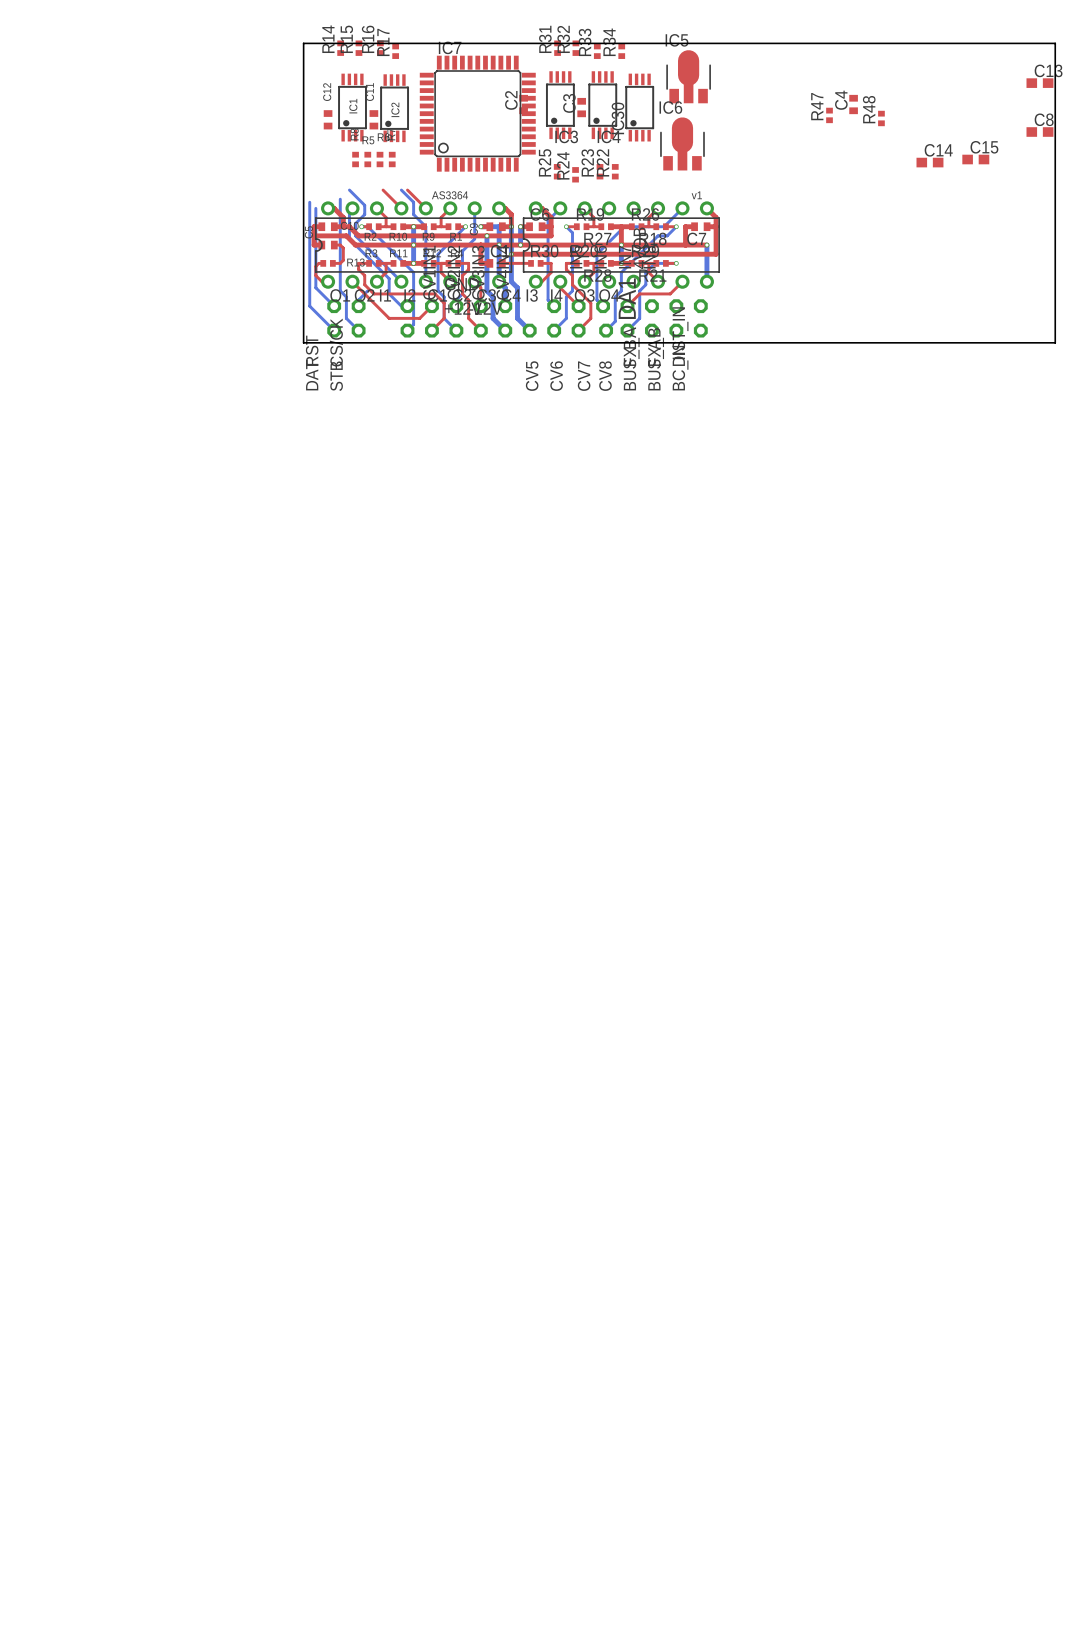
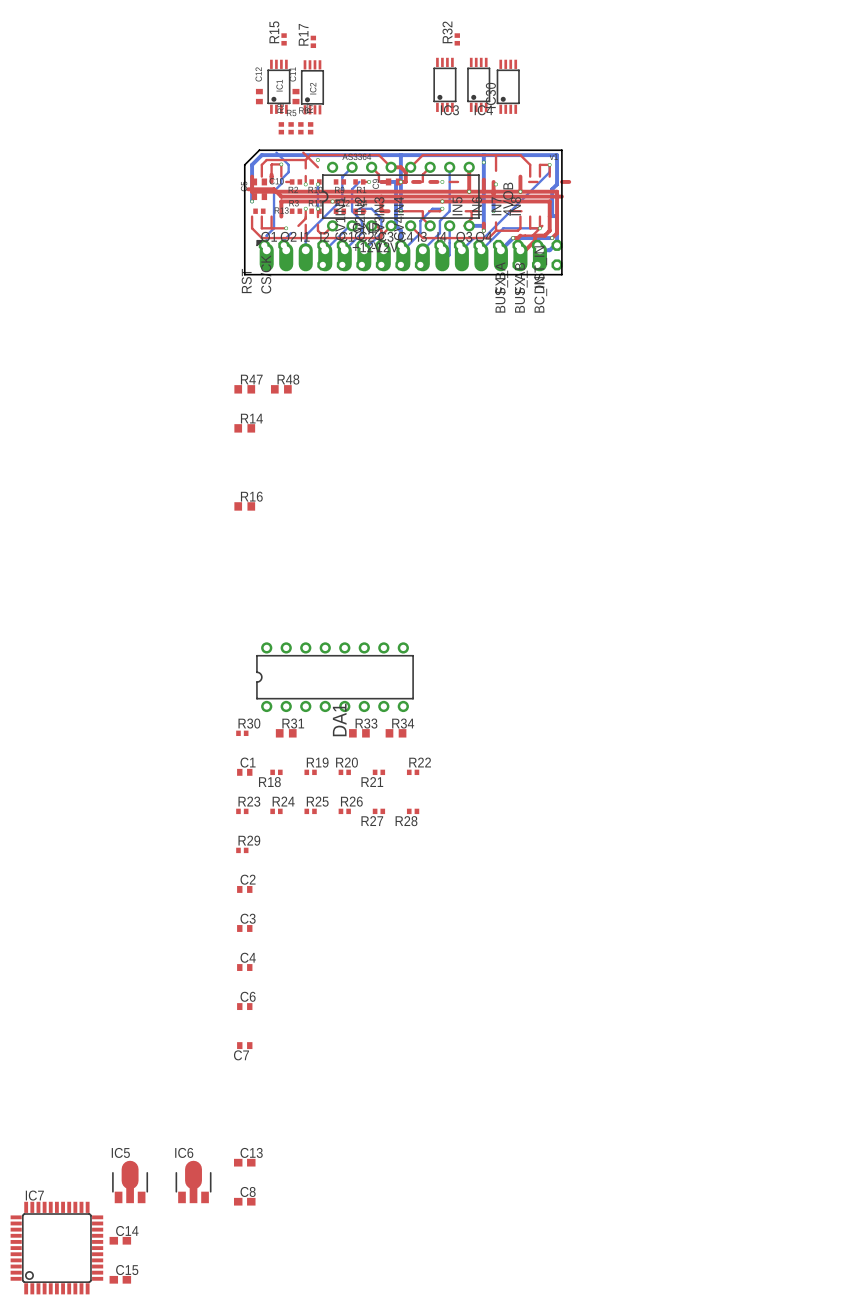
R14 name position: R14 (328, 39) -> R14 (251, 418)
R16 name position: R16 (368, 39) -> R16 (251, 496)
R31 name position: R31 (545, 39) -> R31 (293, 723)
R14 footprint: [337, 40, 345, 56] -> [234, 424, 256, 433]
R16 footprint: [377, 40, 384, 56] -> [234, 502, 256, 511]
R31 footprint: [554, 40, 561, 56] -> [275, 729, 297, 738]
R33 name position: R33 (585, 42) -> R33 (366, 723)
R34 name position: R34 (609, 42) -> R34 (403, 723)
R33 footprint: [593, 43, 601, 59] -> [349, 729, 370, 738]
R34 footprint: [618, 43, 626, 59] -> [385, 729, 407, 738]
IC5 position: (688, 76) -> (130, 1181)
C13 position: (1039, 83) -> (244, 1162)
C2 rotation: 0° (523, 104) -> 90° clockwise (244, 889)
C2 position: (523, 104) -> (244, 889)
C4 rotation: 0° (853, 104) -> 90° clockwise (244, 967)
C4 position: (853, 104) -> (244, 967)
R47 name position: R47 (817, 106) -> R47 (251, 379)
C3 rotation: 0° (581, 107) -> 90° clockwise (244, 928)
C3 position: (581, 107) -> (244, 928)
R47 footprint: [826, 107, 833, 124] -> [234, 385, 256, 394]
R48 name position: R48 (869, 109) -> R48 (288, 379)
R48 footprint: [878, 110, 885, 127] -> [270, 385, 292, 394]
IC7 position: (477, 113) -> (56, 1248)
C8 position: (1039, 132) -> (244, 1201)
IC6 position: (682, 143) -> (193, 1181)
C15 position: (975, 159) -> (120, 1279)
C14 position: (929, 162) -> (120, 1240)
R25 rotation: 0° (557, 171) -> 90° clockwise (310, 811)
R25 position: (557, 171) -> (310, 811)
R23 rotation: 0° (599, 171) -> 90° clockwise (242, 811)
R23 position: (599, 171) -> (242, 811)
R22 rotation: 0° (615, 171) -> 90° clockwise (413, 772)
R22 position: (615, 171) -> (413, 772)
R24 rotation: 0° (575, 174) -> 90° clockwise (276, 811)
R24 position: (575, 174) -> (276, 811)
bottom track: (401, 190) (413, 202) (413, 214) (425, 226) (425, 281) -> none
top track: (407, 190) (425, 208) -> none
bottom track: none -> (400, 155) (400, 211)
bottom track: none -> (483, 155) (483, 230)
top track: none -> (496, 155) (496, 170)
bottom track: (340, 199) (340, 290) (346, 297) (346, 318) (358, 330) -> none
top track: none -> (305, 160) (310, 155) (378, 155) (391, 167)
top track: none -> (305, 160) (266, 160) (261, 164) (261, 176)
top track: none -> (305, 160) (305, 168)
via: none -> (317, 160)
bottom track: (309, 202) (309, 306) (334, 330) -> none
via: none -> (483, 162)
via: none -> (281, 164)
bottom track: none -> (549, 164) (549, 172) (483, 238) (474, 238) (461, 250)
via: none -> (549, 164)
bottom track: (315, 208) (315, 287) (334, 306) -> none
top track: (328, 208) (334, 208) (343, 217) -> (281, 176) (281, 164) (271, 164) (271, 174)
bottom track: (352, 208) (349, 211) (349, 238) (389, 278) (389, 293) (401, 306) (407, 306) -> none
top track: (376, 208) (386, 219) -> none
bottom track: none -> (352, 167) (342, 177) (342, 199) (305, 235) (305, 250)
top track: (450, 208) (441, 217) (441, 226) -> none
bottom track: (474, 208) (474, 238) (462, 251) (462, 293) (456, 300) (456, 306) -> none
top track: none -> (410, 167) (422, 155) (520, 155) (530, 164) (530, 176)
top track: (535, 208) (541, 208) (551, 217) (551, 235) (358, 235) (349, 226) (334, 226) -> none
bottom track: (560, 208) (548, 220) (548, 300) (554, 306) -> none
bottom track: none -> (449, 167) (449, 211) (439, 220) (439, 233) (422, 250)
top track: (584, 208) (593, 217) (593, 226) -> (371, 167) (378, 174) (378, 181)
top track: none -> (469, 167) (469, 191)
top track: (658, 208) (648, 217) (648, 226) -> (430, 167) (422, 174) (422, 181)
bottom track: (682, 208) (664, 226) (624, 226) (596, 254) (596, 300) (603, 306) -> none
top track: (706, 208) (716, 217) (716, 254) (511, 254) -> none
top track: none -> (252, 176) (252, 191) (557, 191) (557, 233) (552, 238)
top track: none -> (520, 176) (520, 191)
top track: none -> (539, 176) (539, 164) (549, 164) (549, 176)
top track: none -> (483, 179) (483, 191)
top track: (321, 226) (314, 226) (314, 245) (321, 245) -> none
bottom track: (361, 226) (367, 226) (413, 272) (413, 324) (407, 330) -> none
via: (361, 226) -> none
top track: (378, 226) (393, 226) -> none
top track: (403, 226) (424, 226) -> none
bottom track: (413, 226) (413, 263) -> none
via: (413, 226) -> none
top track: (433, 226) (448, 226) -> none
bottom track: none -> (359, 181) (352, 189) (352, 211) (361, 220) (361, 233) (344, 250)
bottom track: (465, 226) (438, 254) (438, 290) (444, 297) (444, 318) (456, 330) -> none
via: (480, 226) -> none
via: none -> (400, 181)
bottom track: (511, 226) (511, 281) (517, 287) (517, 318) (529, 330) -> none
via: (511, 226) -> none
bottom track: (520, 226) (520, 245) -> none
via: (520, 226) -> none
C6 position: (535, 226) -> (244, 1006)
via: none -> (442, 181)
bottom track: (566, 226) (572, 232) (572, 290) (566, 297) -> (449, 225) (449, 238)
via: (566, 226) -> none
R19 position: (581, 226) -> (310, 772)
top track: (586, 226) (601, 226) -> none
R27 position: (606, 226) -> (378, 811)
top track: (610, 226) (631, 226) -> none
R26 position: (636, 226) -> (344, 811)
top track: (641, 226) (656, 226) -> none
R18 position: (661, 226) -> (276, 772)
bottom track: (676, 226) (667, 235) (658, 235) (621, 272) (621, 290) (615, 297) (615, 321) (606, 330) -> none
via: (676, 226) -> none
top track: (694, 226) (685, 226) (685, 245) -> none
C7 position: (700, 226) -> (244, 1045)
bottom track: (355, 229) (355, 235) (401, 281) -> (281, 183) (274, 191) (274, 228) (266, 235) (266, 250)
via: none -> (305, 184)
bottom track: none -> (317, 184) (317, 208)
via: none -> (317, 184)
via: none -> (496, 184)
bottom track: (486, 235) (486, 290) (493, 297) (493, 318) (505, 330) -> none
via: (486, 235) -> none
via: none -> (469, 191)
via: none -> (520, 191)
top track: (334, 245) (340, 245) (343, 248) (343, 260) (340, 263) (332, 263) -> none
part position: (413, 245) -> (400, 196)
via: (413, 245) -> none
via: (499, 245) -> none
via: (520, 245) -> none
DA1 position: (621, 245) -> (335, 677)
via: (621, 245) -> none
bottom track: (706, 245) (706, 281) -> none
via: (706, 245) -> none
bottom track: none -> (252, 201) (252, 164) (261, 155) (557, 155) (557, 184) (552, 189) (552, 216) (557, 216) (557, 242) (549, 250) (539, 250)
via: none -> (252, 201)
via: none -> (332, 201)
via: none -> (442, 201)
via: (511, 254) -> none
via: none -> (305, 208)
top track: none -> (317, 208) (317, 217)
via: none -> (317, 208)
bottom track: none -> (359, 208) (371, 208) (381, 218) (381, 233) (364, 250)
bottom track: none -> (442, 208) (432, 208) (420, 220) (420, 233) (403, 250)
via: none -> (442, 208)
top track: (323, 263) (318, 263) (315, 266) (315, 275) (321, 281) (328, 281) -> none
top track: (369, 263) (358, 263) (358, 269) (364, 275) (364, 284) (373, 293) (435, 293) (444, 303) (444, 318) (431, 330) -> none
top track: (378, 263) (393, 263) -> none
top track: (403, 263) (424, 263) -> none
via: (413, 263) -> none
top track: (433, 263) (448, 263) -> none
top track: (441, 263) (441, 272) (450, 281) -> none
top track: (460, 263) (468, 263) (468, 269) (462, 275) (462, 293) (468, 300) (468, 318) (480, 330) -> none
C1 position: (496, 263) -> (244, 772)
via: none -> (400, 211)
R30 position: (535, 263) -> (242, 733)
top track: (551, 263) (551, 272) (541, 281) (535, 281) -> (437, 211) (442, 208)
top track: (576, 263) (566, 263) (566, 269) (572, 275) (572, 284) (590, 303) (590, 318) (578, 330) -> none
R20 position: (581, 263) -> (344, 772)
R28 position: (606, 263) -> (413, 811)
top track: (610, 263) (631, 263) -> none
R29 position: (636, 263) -> (242, 850)
top track: (648, 263) (648, 272) (658, 281) -> (422, 211) (422, 218) (430, 225)
R21 position: (661, 263) -> (378, 772)
top track: (665, 263) (676, 263) -> none
bottom track: (676, 263) (654, 263) (645, 272) (645, 284) (639, 290) (639, 318) (627, 330) -> none
via: (676, 263) -> none
top track: none -> (252, 216) (252, 228) (261, 238) (378, 238) (391, 225)
top track: none -> (261, 216) (261, 228) (286, 228)
top track: none -> (271, 216) (271, 228)
top track: none -> (281, 216) (281, 201) (549, 201) (549, 230) (544, 235) (535, 235) (535, 240) (525, 250) (520, 250)
top track: none -> (520, 216) (520, 228) (517, 230) (496, 230)
top track: none -> (530, 216) (530, 228) (539, 228) (539, 216)
top track: none -> (496, 222) (496, 230)
top track: none -> (483, 223) (483, 230)
top track: none -> (305, 224) (305, 238)
top track: none -> (317, 224) (317, 230) (320, 233) (325, 233) (332, 225)
top track: (352, 281) (389, 318) (419, 318) (431, 306) -> none
bottom track: none -> (352, 225) (349, 225) (325, 250)
top track: none -> (410, 225) (422, 238) (488, 238) (496, 230)
top track: (560, 281) (560, 287) (578, 306) -> none
bottom track: none -> (469, 225) (483, 225)
via: none -> (286, 228)
bottom track: none -> (539, 228) (503, 228) (481, 250)
via: none -> (539, 228)
via: none -> (483, 230)
top track: (654, 293) (639, 293) (627, 306) -> (520, 235) (517, 238) (513, 238)
via: none -> (513, 238)
bottom track: none -> (552, 238) (513, 238) (500, 250)
via: none -> (552, 238)
part: none -> (401, 255)
DAT: (334, 330) -> none
STB: (358, 330) -> none
CV5: (554, 330) -> none
CV6: (578, 330) -> none
CV7: (606, 330) -> none
CV8: (627, 330) -> none
board edge: (309, 342) (303, 342) (303, 43) (1055, 43) (1055, 342) (706, 342) -> (244, 274) (244, 164) (259, 150) (561, 150) (561, 274)

